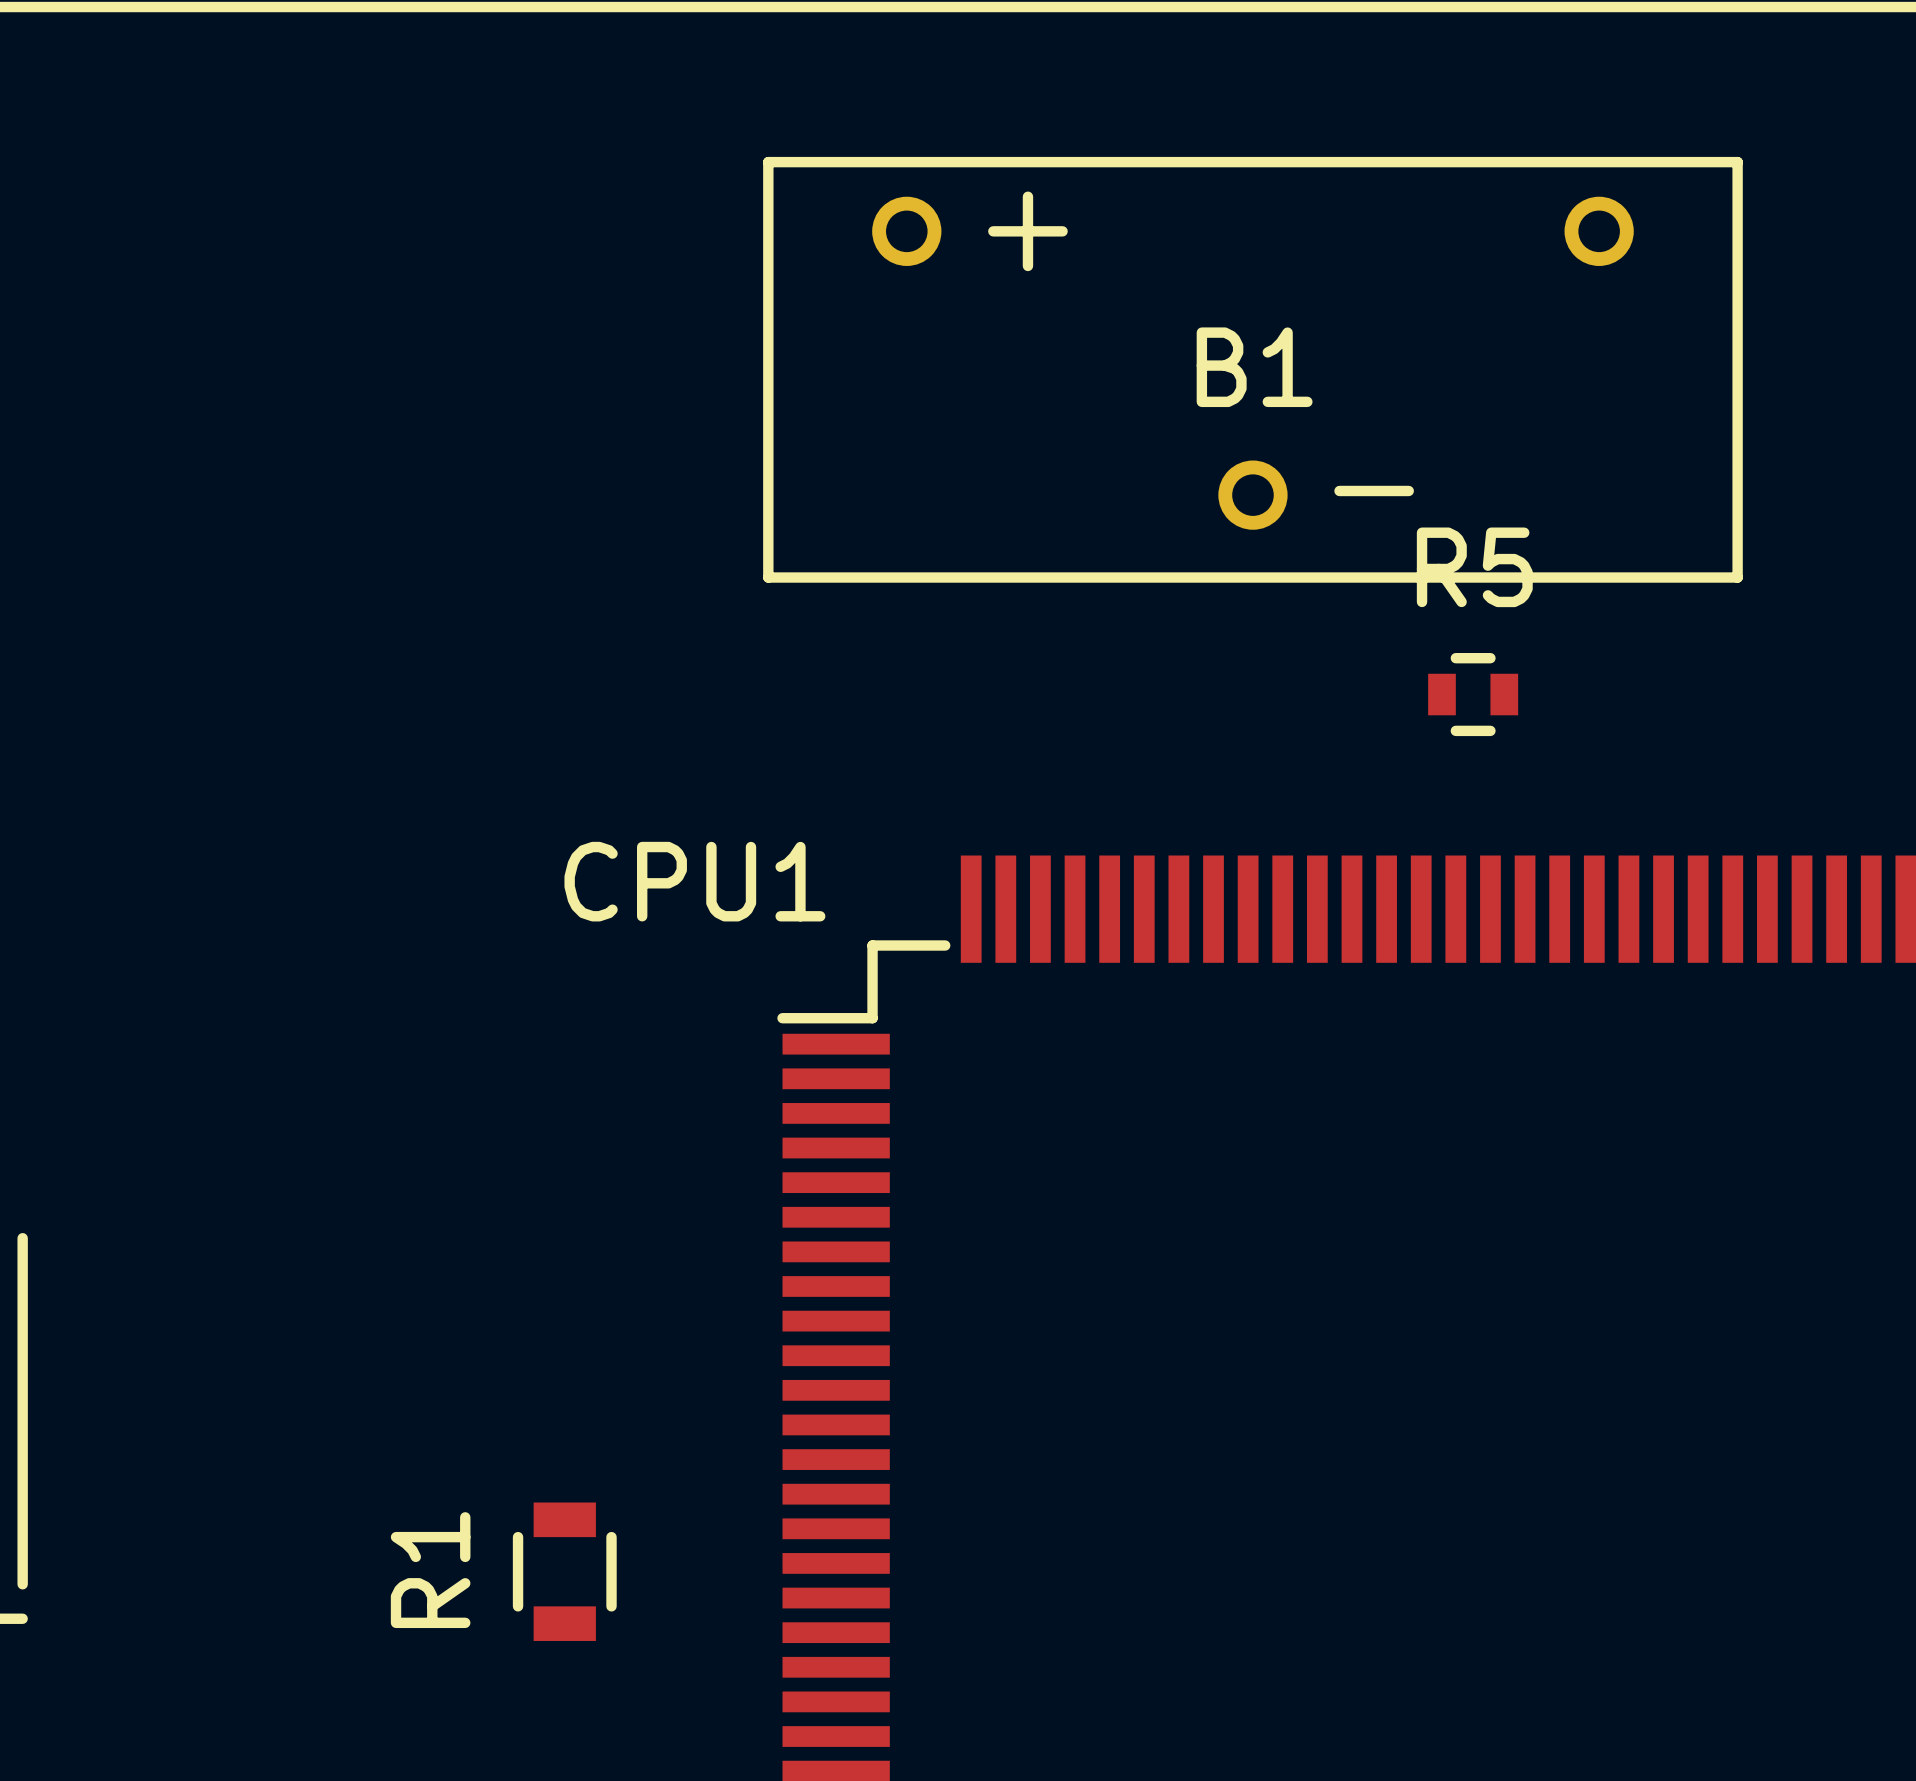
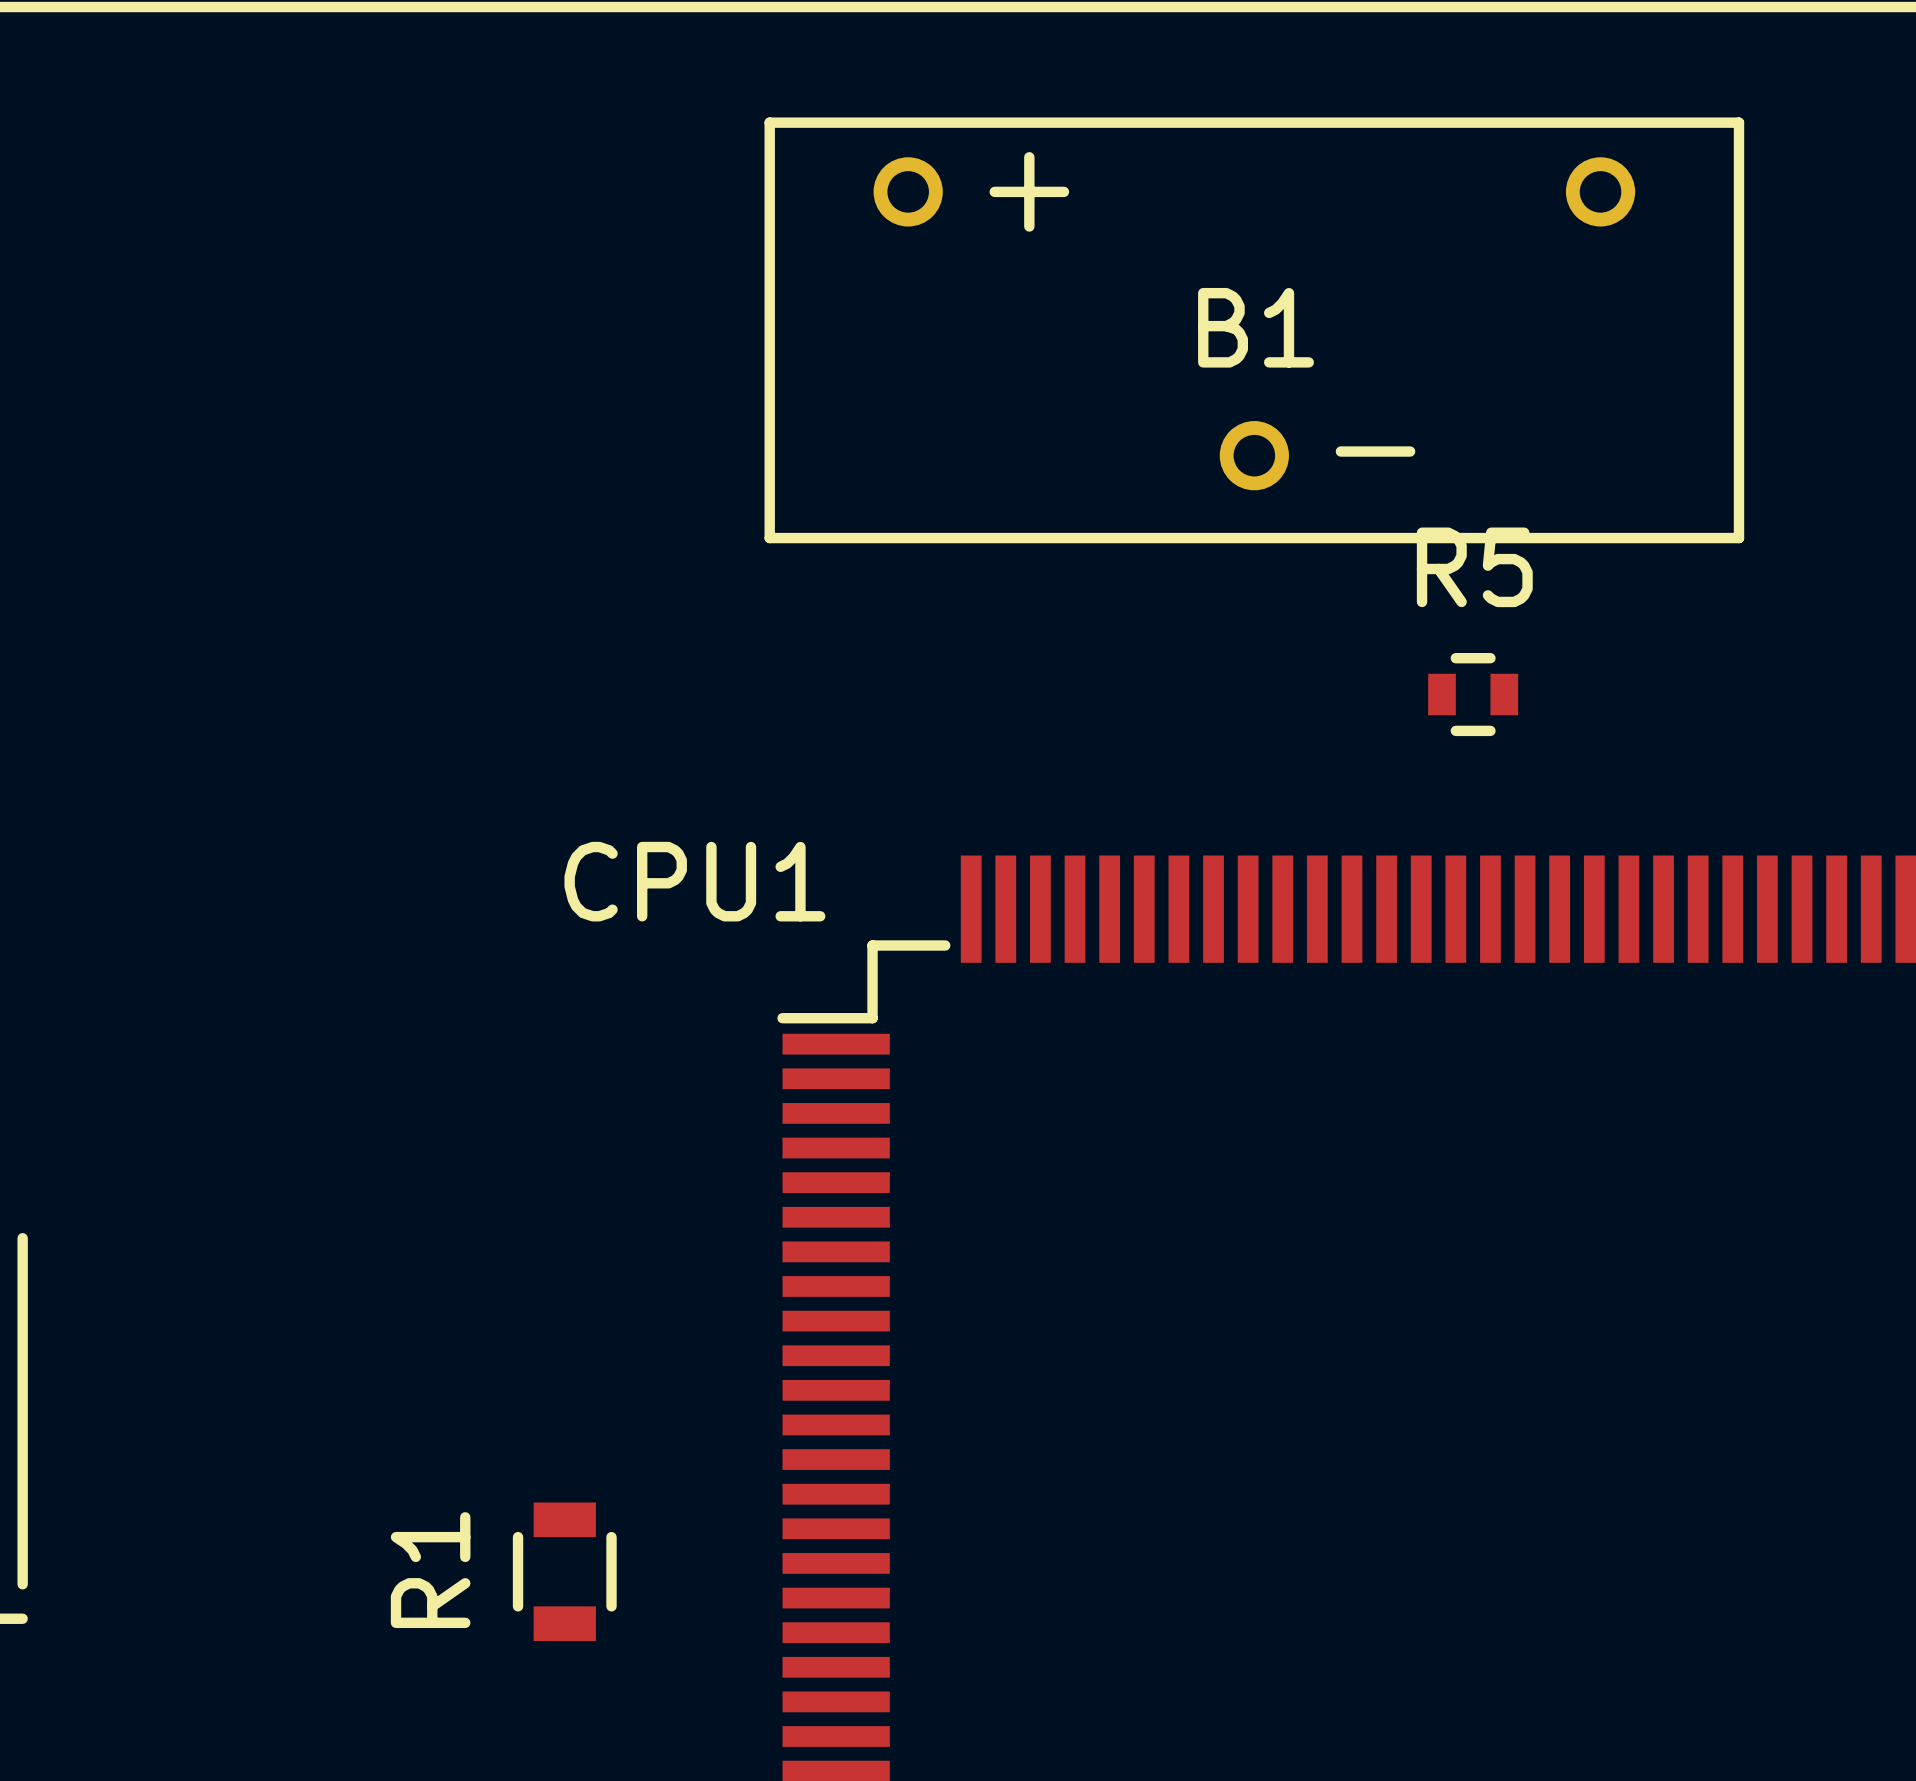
B1 position: (1252, 369) -> (1254, 330)

